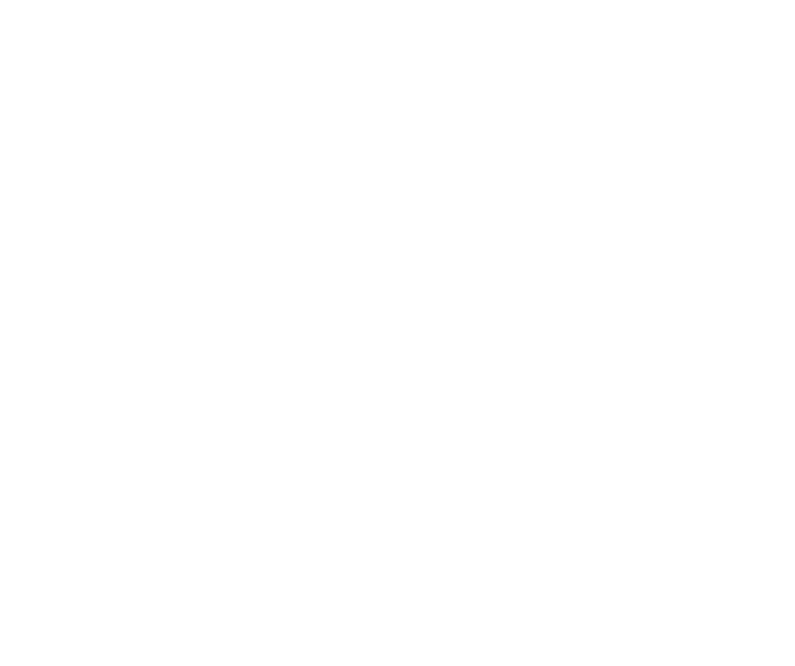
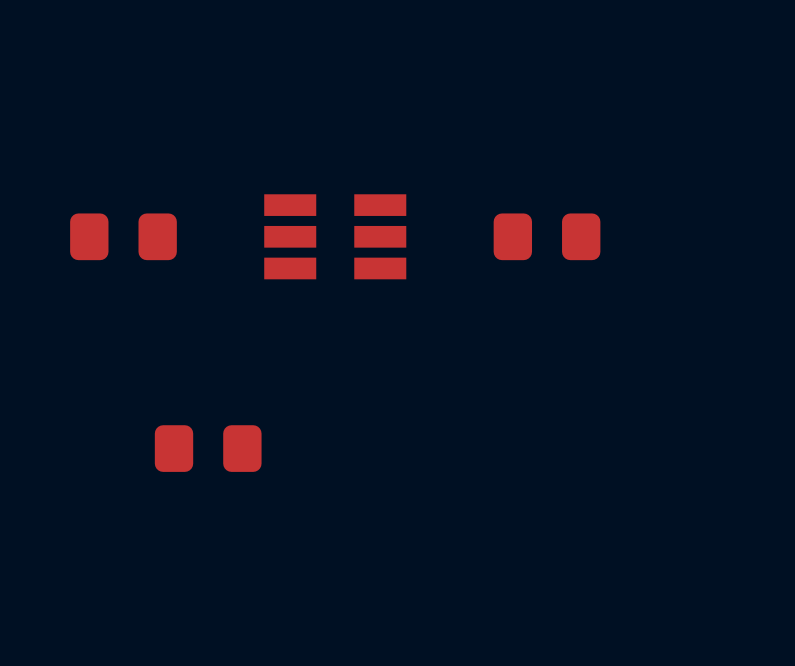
part: none -> (123, 236)
part: none -> (335, 236)
part: none -> (547, 236)
part: none -> (208, 448)

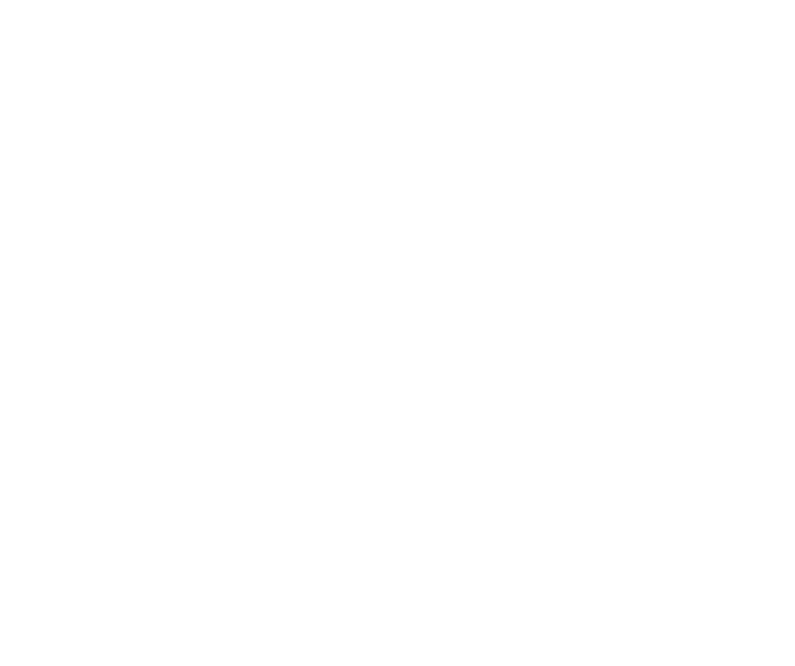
part: (123, 236) -> none
part: (335, 236) -> none
part: (547, 236) -> none
part: (208, 448) -> none

